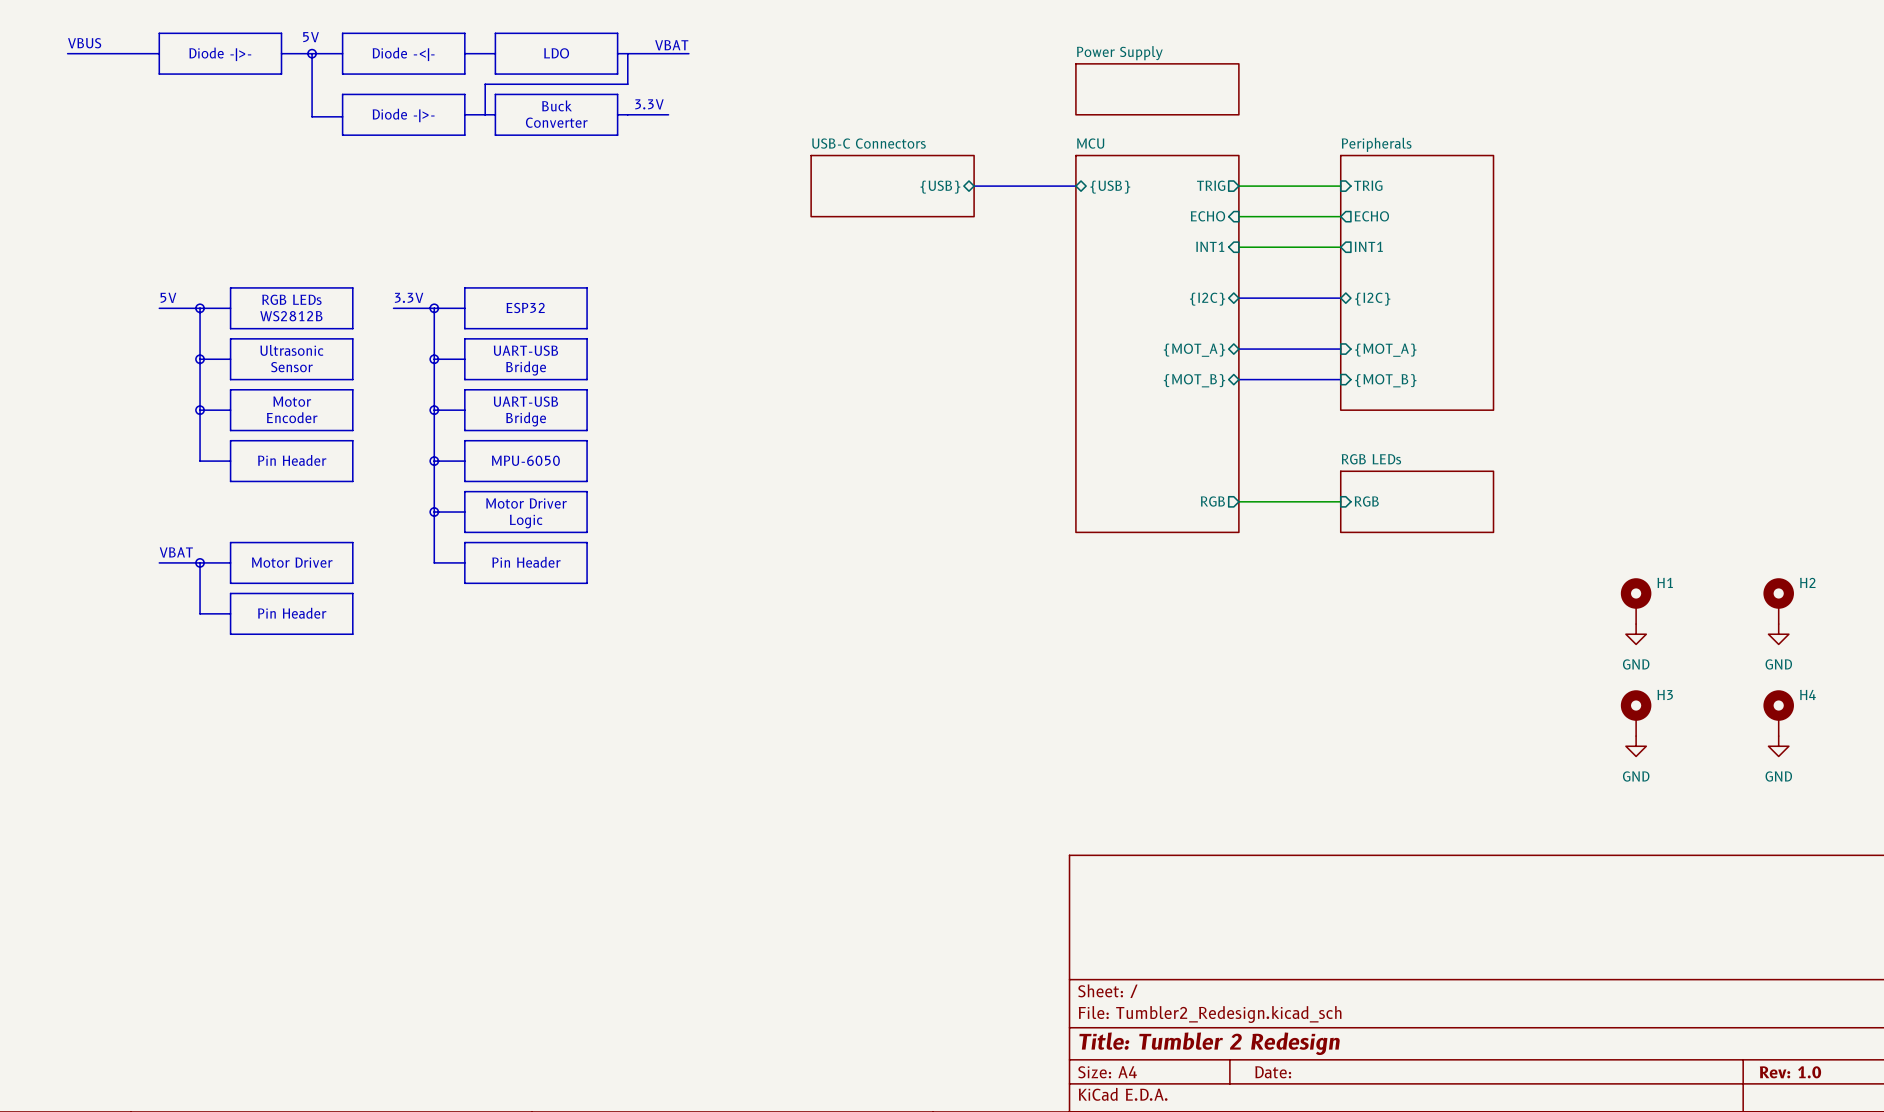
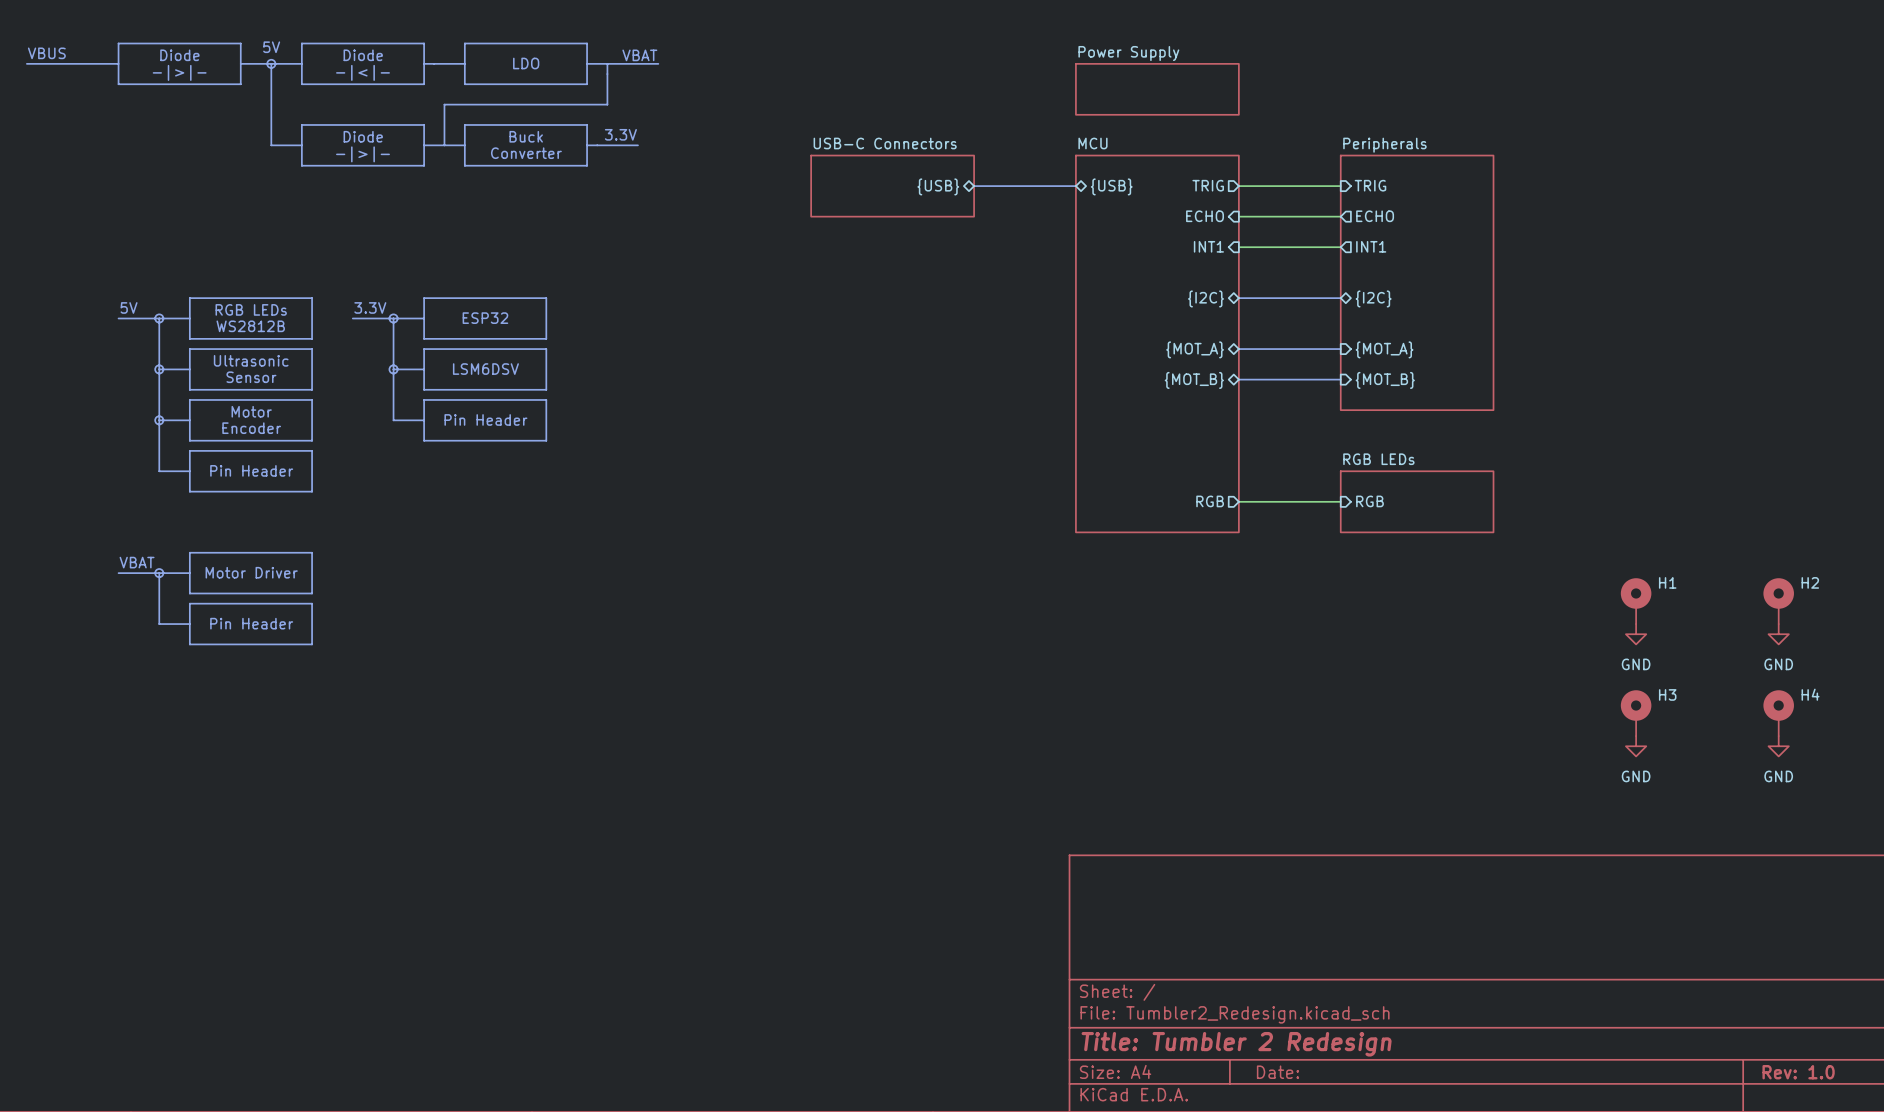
line: (159, 33) (281, 33) (281, 74) (159, 74) (159, 33) -> (118, 43) (240, 43) (240, 84) (118, 84) (118, 43)
line: (495, 33) (495, 74) (617, 74) (617, 33) (495, 33) -> (301, 43) (301, 84) (424, 84) (424, 43) (301, 43)
text position: 5V (311, 37) -> 5V (271, 47)
text position: VBUS (84, 43) -> VBUS (46, 53)
line: (464, 43) (464, 33) (342, 33) (342, 74) (464, 74) -> (485, 84) (464, 84) (464, 74)
text position: VBAT (671, 45) -> VBAT (639, 55)
line: (67, 53) (159, 53) -> (26, 63) (118, 63)
line: (281, 53) (342, 53) -> (240, 63) (301, 63)
line: (312, 53) (312, 116) (342, 116) -> none
drawing position: (312, 53) -> (271, 63)
line: (464, 53) (495, 53) -> none
text position: LDO (556, 53) -> LDO (526, 63)
line: (617, 53) (688, 53) -> (587, 63) (658, 63)
line: (627, 53) (627, 84) (587, 84) -> (464, 43) (587, 43) (587, 84)
text: Diode -|>- (220, 54) -> Diode (179, 55)
text: Diode -<|- (403, 54) -> Diode (363, 55)
line: none -> (271, 63) (271, 145) (301, 145)
line: none -> (424, 63) (464, 63)
line: none -> (607, 63) (607, 104) (444, 104) (444, 145)
text: none -> -|>|- (179, 72)
text: none -> -|<|- (362, 72)
line: (485, 84) (485, 114) -> none
line: (495, 94) (617, 94) (617, 135) (495, 135) (495, 94) -> (301, 124) (424, 124) (424, 165) (301, 165) (301, 124)
text position: 3.3V (649, 104) -> 3.3V (620, 134)
text position: Buck (557, 105) -> Buck (526, 136)
line: (464, 114) (495, 114) -> none
line: (617, 114) (668, 114) -> (587, 145) (637, 145)
text: Diode -|>- (403, 115) -> none
text position: Converter (556, 122) -> Converter (526, 153)
line: (464, 124) (464, 94) (342, 94) (342, 135) (464, 135) -> (464, 124) (587, 124) (587, 165) (464, 165) (464, 135)
text: none -> Diode (363, 136)
line: none -> (424, 145) (464, 145)
text: none -> -|>|- (362, 154)
line: (230, 287) (230, 328) (352, 328) (352, 287) (230, 287) -> (189, 450) (189, 491) (312, 491) (312, 450) (189, 450)
line: (464, 287) (464, 328) (587, 328) (587, 287) (464, 287) -> none
text position: 5V (168, 297) -> 5V (129, 307)
text position: 3.3V (409, 297) -> 3.3V (370, 307)
text position: RGB LEDs (291, 299) -> RGB LEDs (251, 309)
drawing: [195, 304, 205, 313] -> none
drawing: [430, 304, 439, 313] -> none
line: (159, 308) (230, 308) -> (118, 318) (189, 318)
line: (200, 308) (200, 461) (230, 461) -> (159, 318) (159, 471) (189, 471)
line: (393, 308) (464, 308) -> (352, 318) (424, 318)
line: (434, 308) (434, 562) (464, 562) -> none
text position: ESP32 (525, 308) -> ESP32 (485, 318)
drawing: none -> [155, 314, 164, 323]
drawing: none -> [389, 314, 398, 323]
text position: WS2812B (291, 316) -> WS2812B (250, 326)
line: none -> (393, 318) (393, 420) (424, 420)
line: (230, 338) (230, 379) (352, 379) (352, 338) (312, 338) -> (230, 338) (189, 338) (189, 298) (312, 298) (312, 338)
line: (464, 338) (464, 379) (587, 379) (587, 338) (546, 338) -> (464, 338) (424, 338) (424, 298) (546, 298) (546, 338)
text position: Ultrasonic (291, 350) -> Ultrasonic (251, 360)
text: UART-USB (525, 350) -> none
drawing: [195, 355, 205, 364] -> none
drawing: [430, 355, 439, 364] -> none
line: (200, 359) (230, 359) -> (159, 369) (189, 369)
line: (434, 359) (464, 359) -> (393, 369) (424, 369)
drawing: none -> [155, 365, 164, 374]
drawing: none -> [389, 365, 398, 374]
text position: Sensor (291, 367) -> Sensor (251, 377)
text: Bridge (526, 368) -> none
text: none -> LSM6DSV (485, 369)
line: (230, 389) (230, 430) (352, 430) (352, 389) (312, 389) -> (230, 389) (189, 389) (189, 349) (312, 349) (312, 389)
line: (464, 389) (464, 430) (587, 430) (587, 389) (546, 389) -> (464, 389) (424, 389) (424, 349) (546, 349) (546, 389)
text position: Motor (292, 401) -> Motor (251, 411)
text: UART-USB (525, 401) -> none
drawing: [195, 406, 205, 415] -> none
drawing: [430, 406, 439, 415] -> none
line: (200, 410) (230, 410) -> (159, 420) (189, 420)
line: (434, 410) (464, 410) -> none
drawing: none -> [155, 416, 164, 425]
text position: Encoder (292, 417) -> Encoder (251, 428)
text: none -> Pin Header (485, 419)
text: Bridge (526, 419) -> none
line: (230, 440) (230, 481) (352, 481) (352, 440) (312, 440) -> (230, 440) (189, 440) (189, 399) (312, 399) (312, 440)
line: (464, 440) (464, 481) (587, 481) (587, 440) (546, 440) -> (464, 440) (424, 440) (424, 399) (546, 399) (546, 440)
drawing: [430, 456, 439, 466] -> none
text position: Pin Header (292, 460) -> Pin Header (251, 470)
text: MPU-6050 (525, 460) -> none
line: (434, 461) (464, 461) -> none
line: (464, 491) (464, 532) (587, 532) (587, 491) (464, 491) -> none
text: Motor Driver (526, 503) -> none
drawing: [430, 507, 439, 517] -> none
line: (434, 512) (464, 512) -> none
text: Logic (526, 521) -> none
line: (230, 542) (230, 583) (352, 583) (352, 542) (230, 542) -> (189, 603) (189, 644) (312, 644) (312, 603) (189, 603)
line: (464, 542) (464, 583) (587, 583) (587, 542) (464, 542) -> none
text position: VBAT (176, 552) -> VBAT (137, 562)
line: (159, 562) (230, 562) -> (118, 573) (189, 573)
line: (200, 562) (200, 613) (230, 613) -> (159, 573) (159, 624) (189, 624)
drawing position: (200, 562) -> (159, 573)
text position: Motor Driver (292, 562) -> Motor Driver (251, 572)
text: Pin Header (526, 562) -> none
line: (230, 593) (230, 634) (352, 634) (352, 593) (312, 593) -> (230, 593) (189, 593) (189, 552) (312, 552) (312, 593)
text position: Pin Header (292, 613) -> Pin Header (251, 623)

